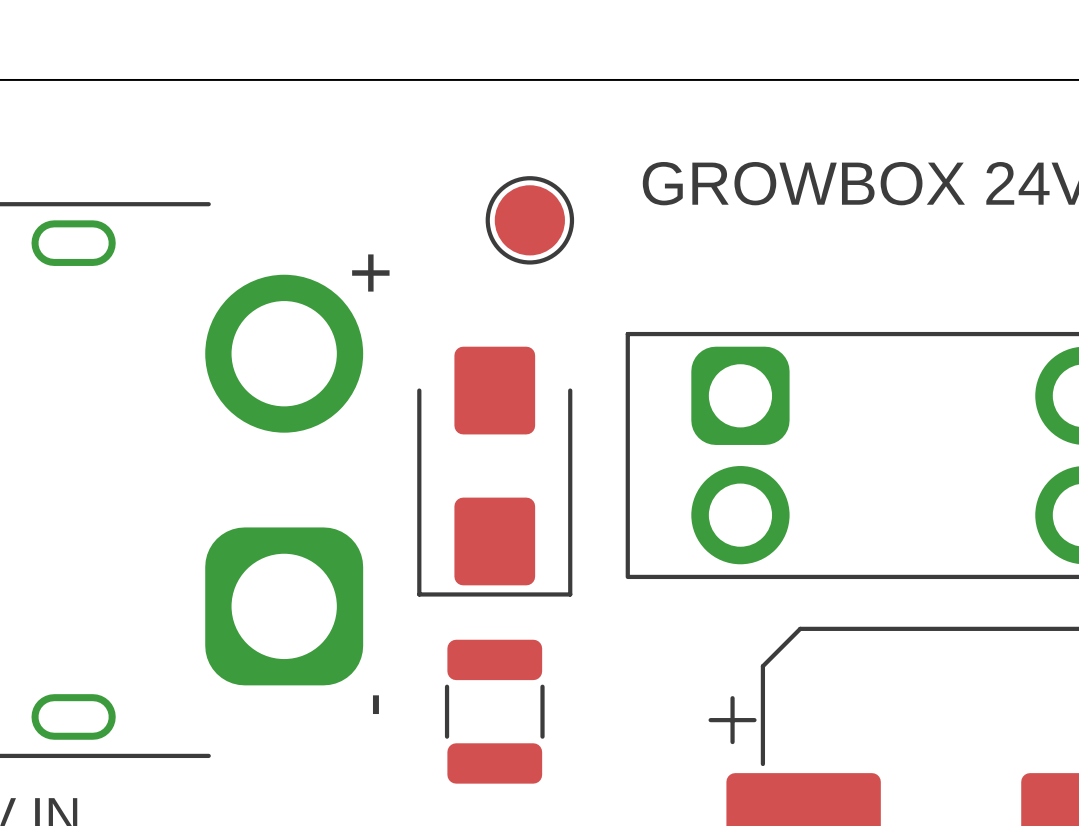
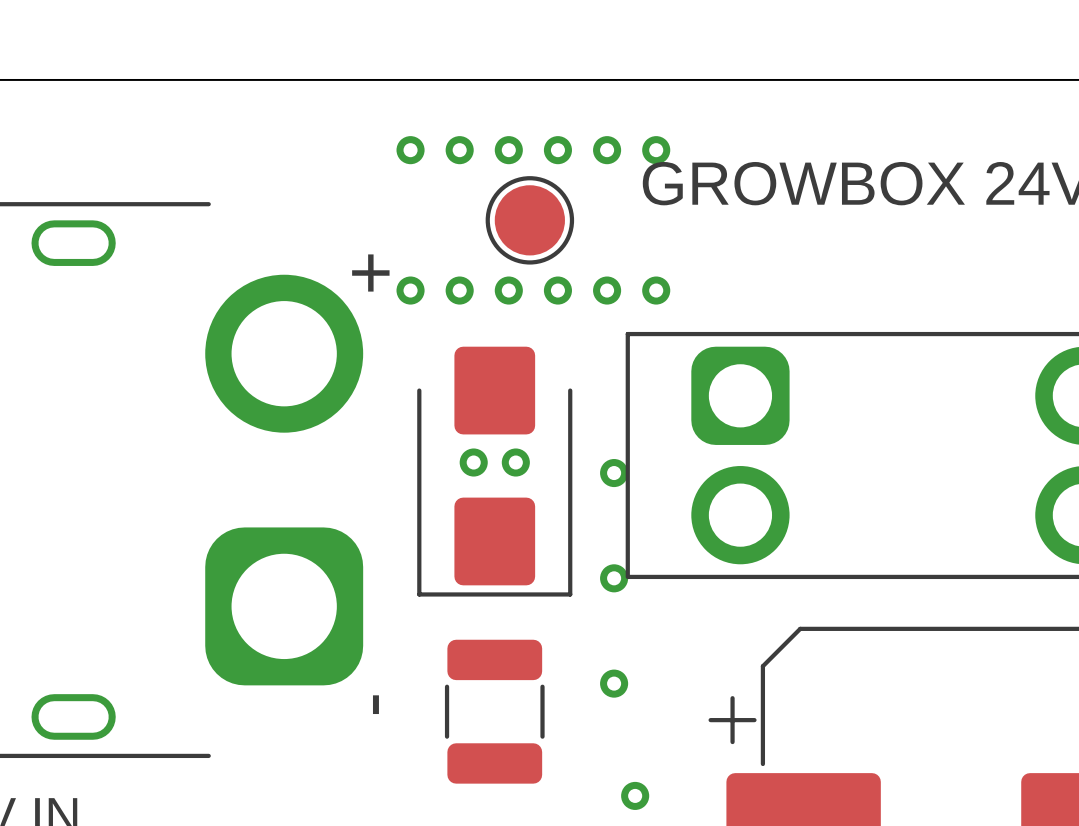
via: none -> (410, 150)
via: none -> (459, 150)
via: none -> (508, 150)
via: none -> (557, 150)
via: none -> (607, 150)
via: none -> (656, 150)
via: none -> (410, 290)
via: none -> (459, 290)
via: none -> (508, 290)
via: none -> (557, 290)
via: none -> (607, 290)
via: none -> (656, 290)
via: none -> (473, 462)
via: none -> (515, 462)
via: none -> (614, 473)
via: none -> (614, 578)
via: none -> (614, 683)
via: none -> (635, 795)

